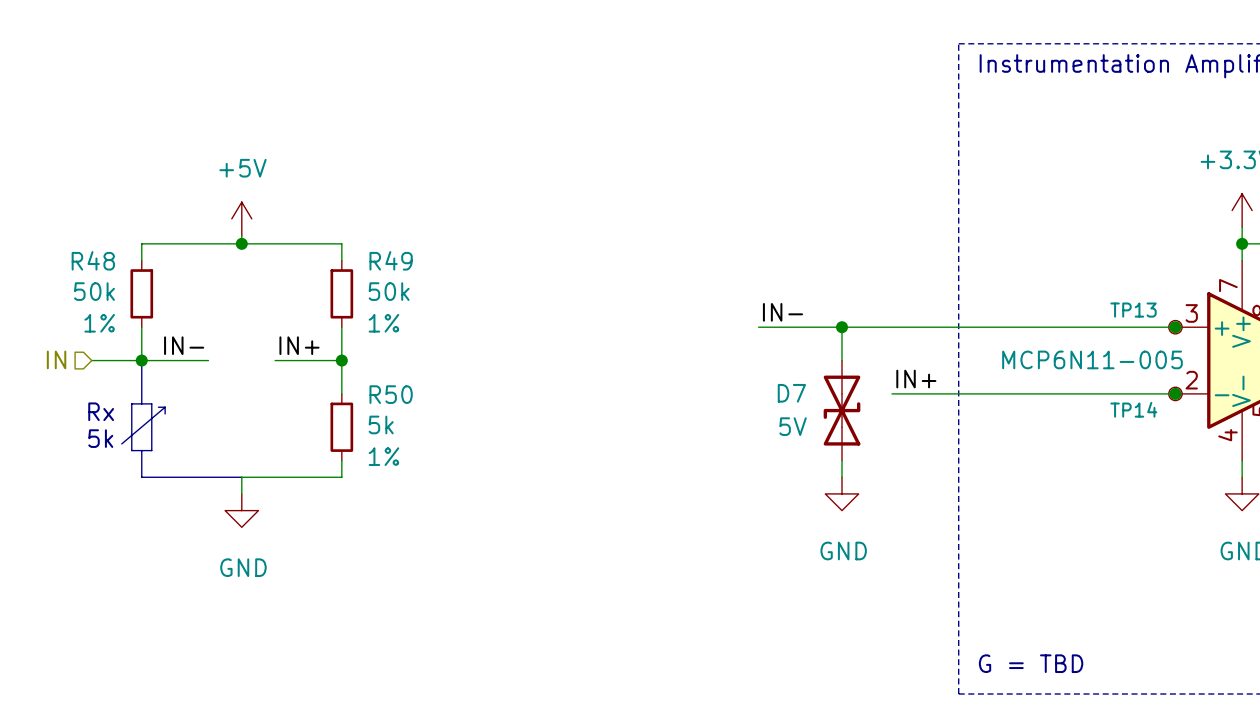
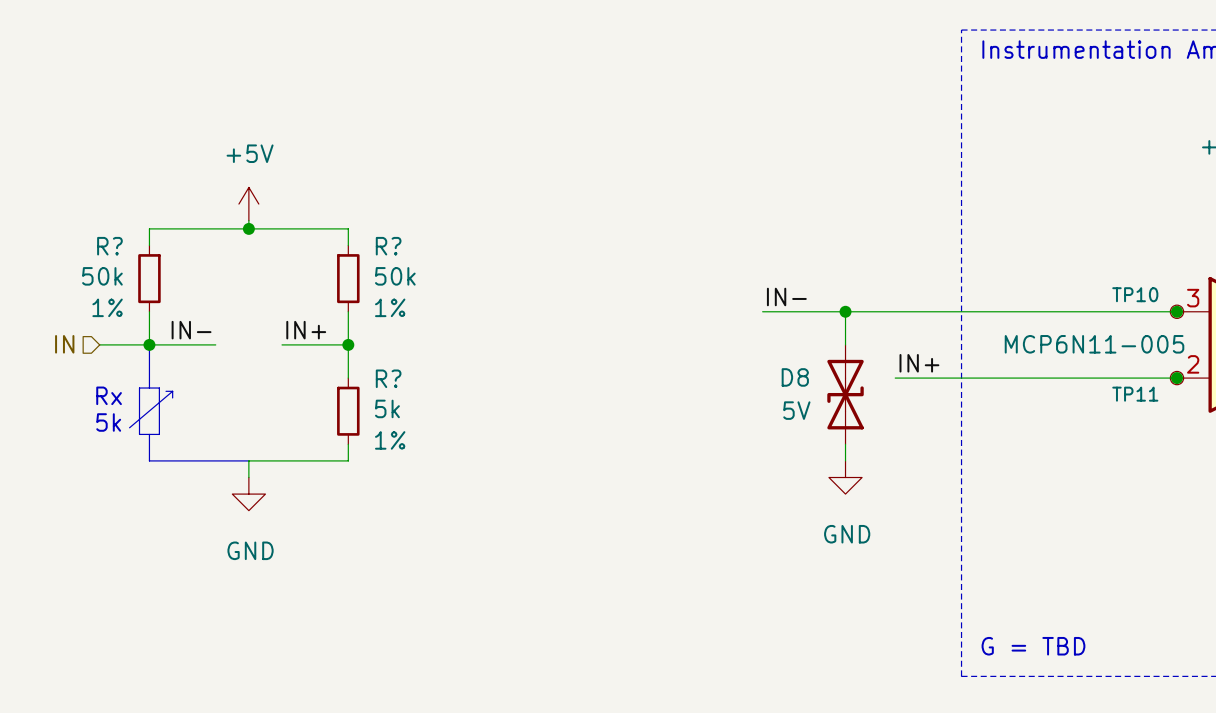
R48 name: R48 (93, 260) -> R? (109, 246)
R49 name: R49 (391, 260) -> R? (388, 246)
TP13 name: TP13 (1133, 310) -> TP10 (1135, 294)
D7 name: D7 (791, 393) -> D8 (795, 377)
R50 name: R50 (391, 394) -> R? (388, 378)
TP14 name: TP14 (1133, 409) -> TP11 (1135, 394)

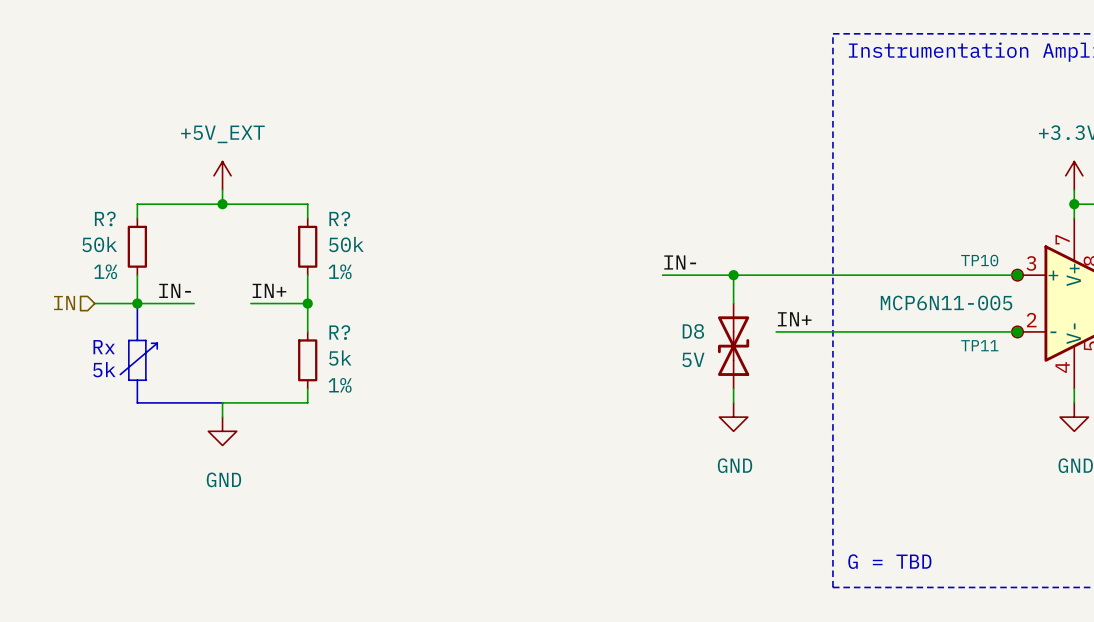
power symbol: +5V (248, 204) -> +5V_EXT (222, 175)

